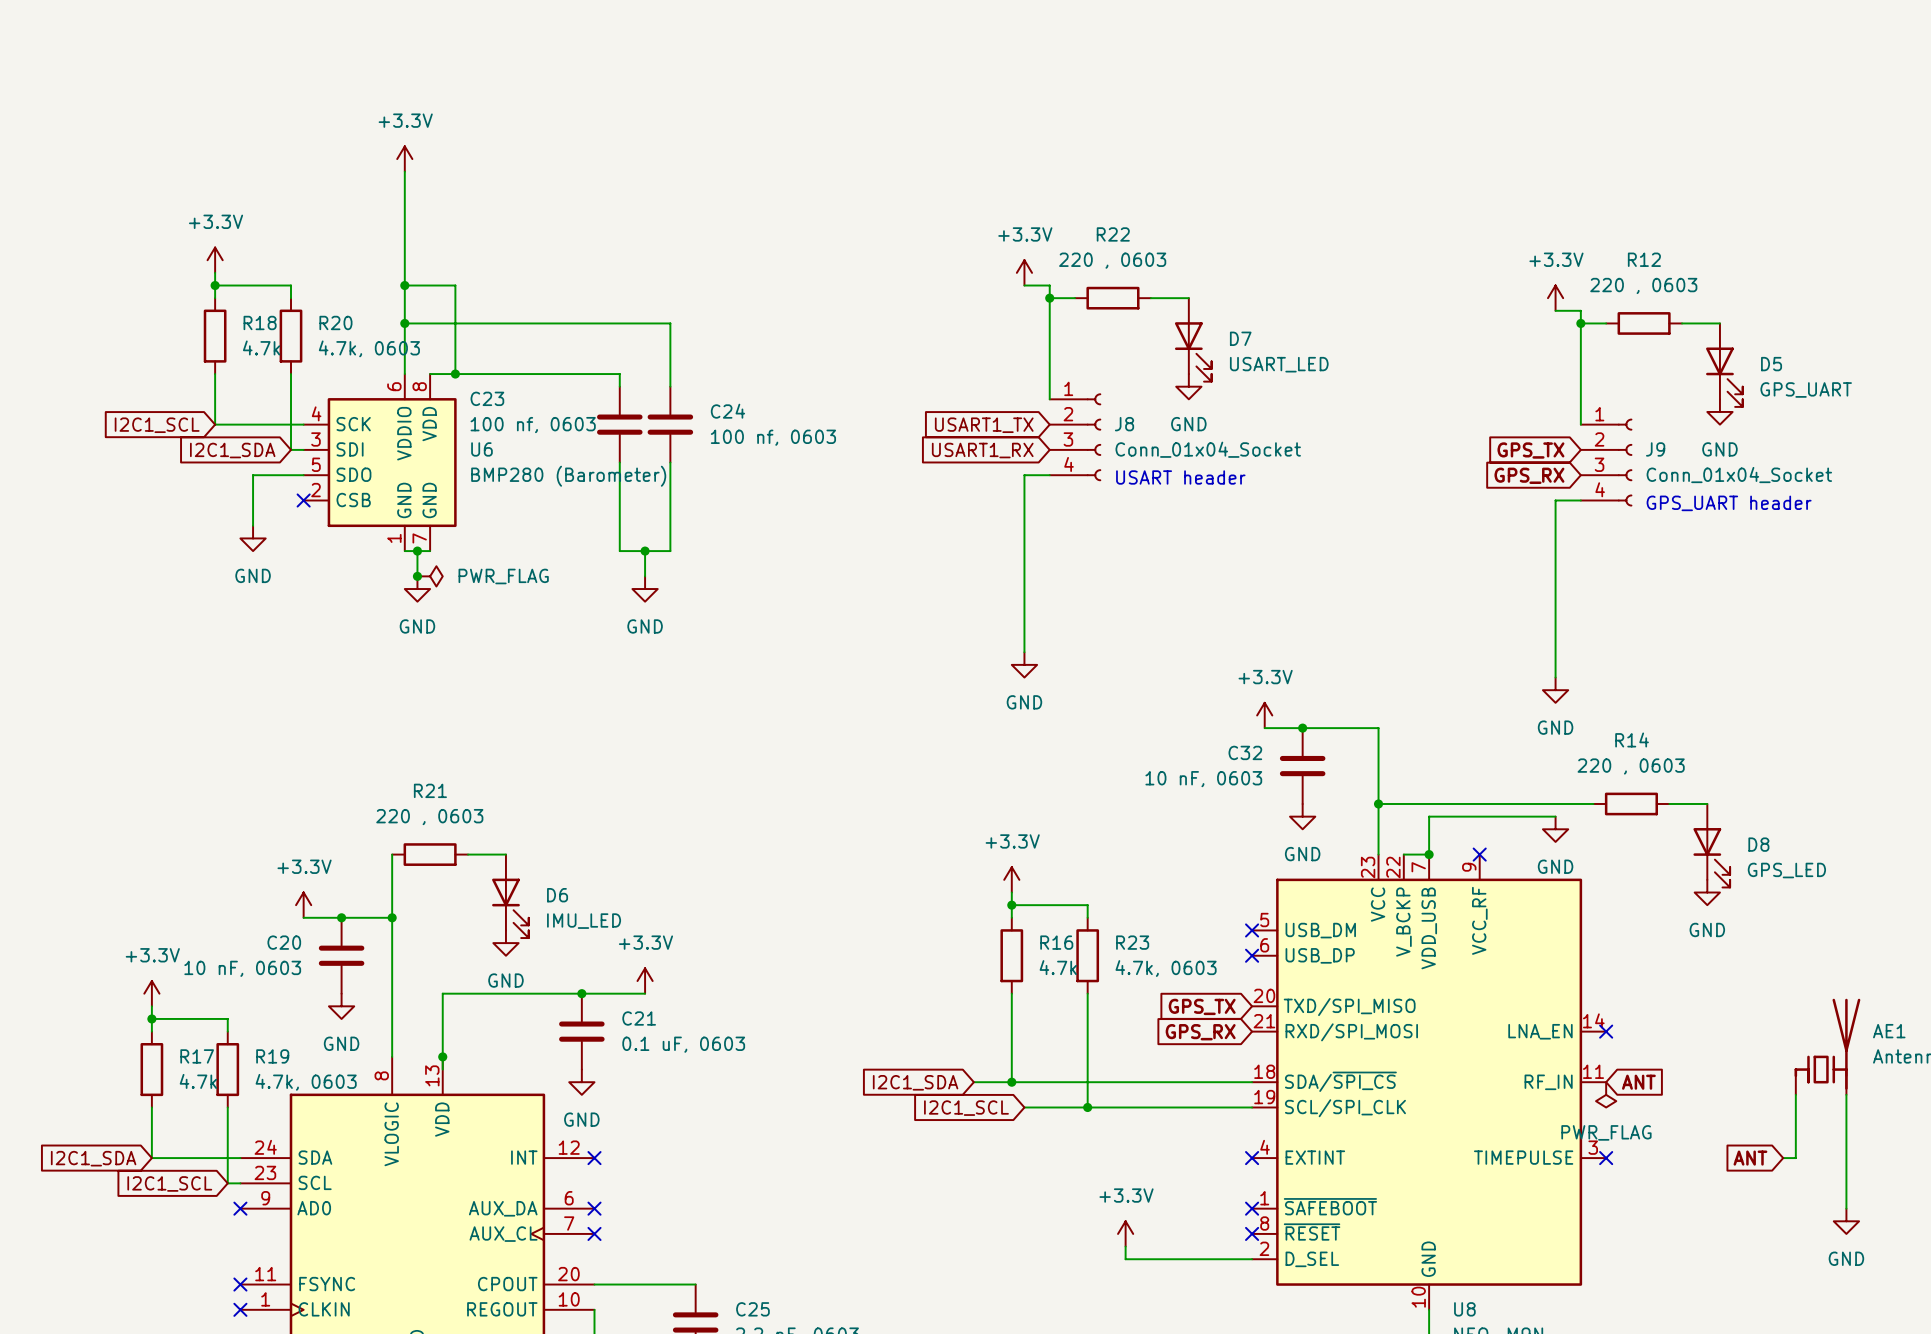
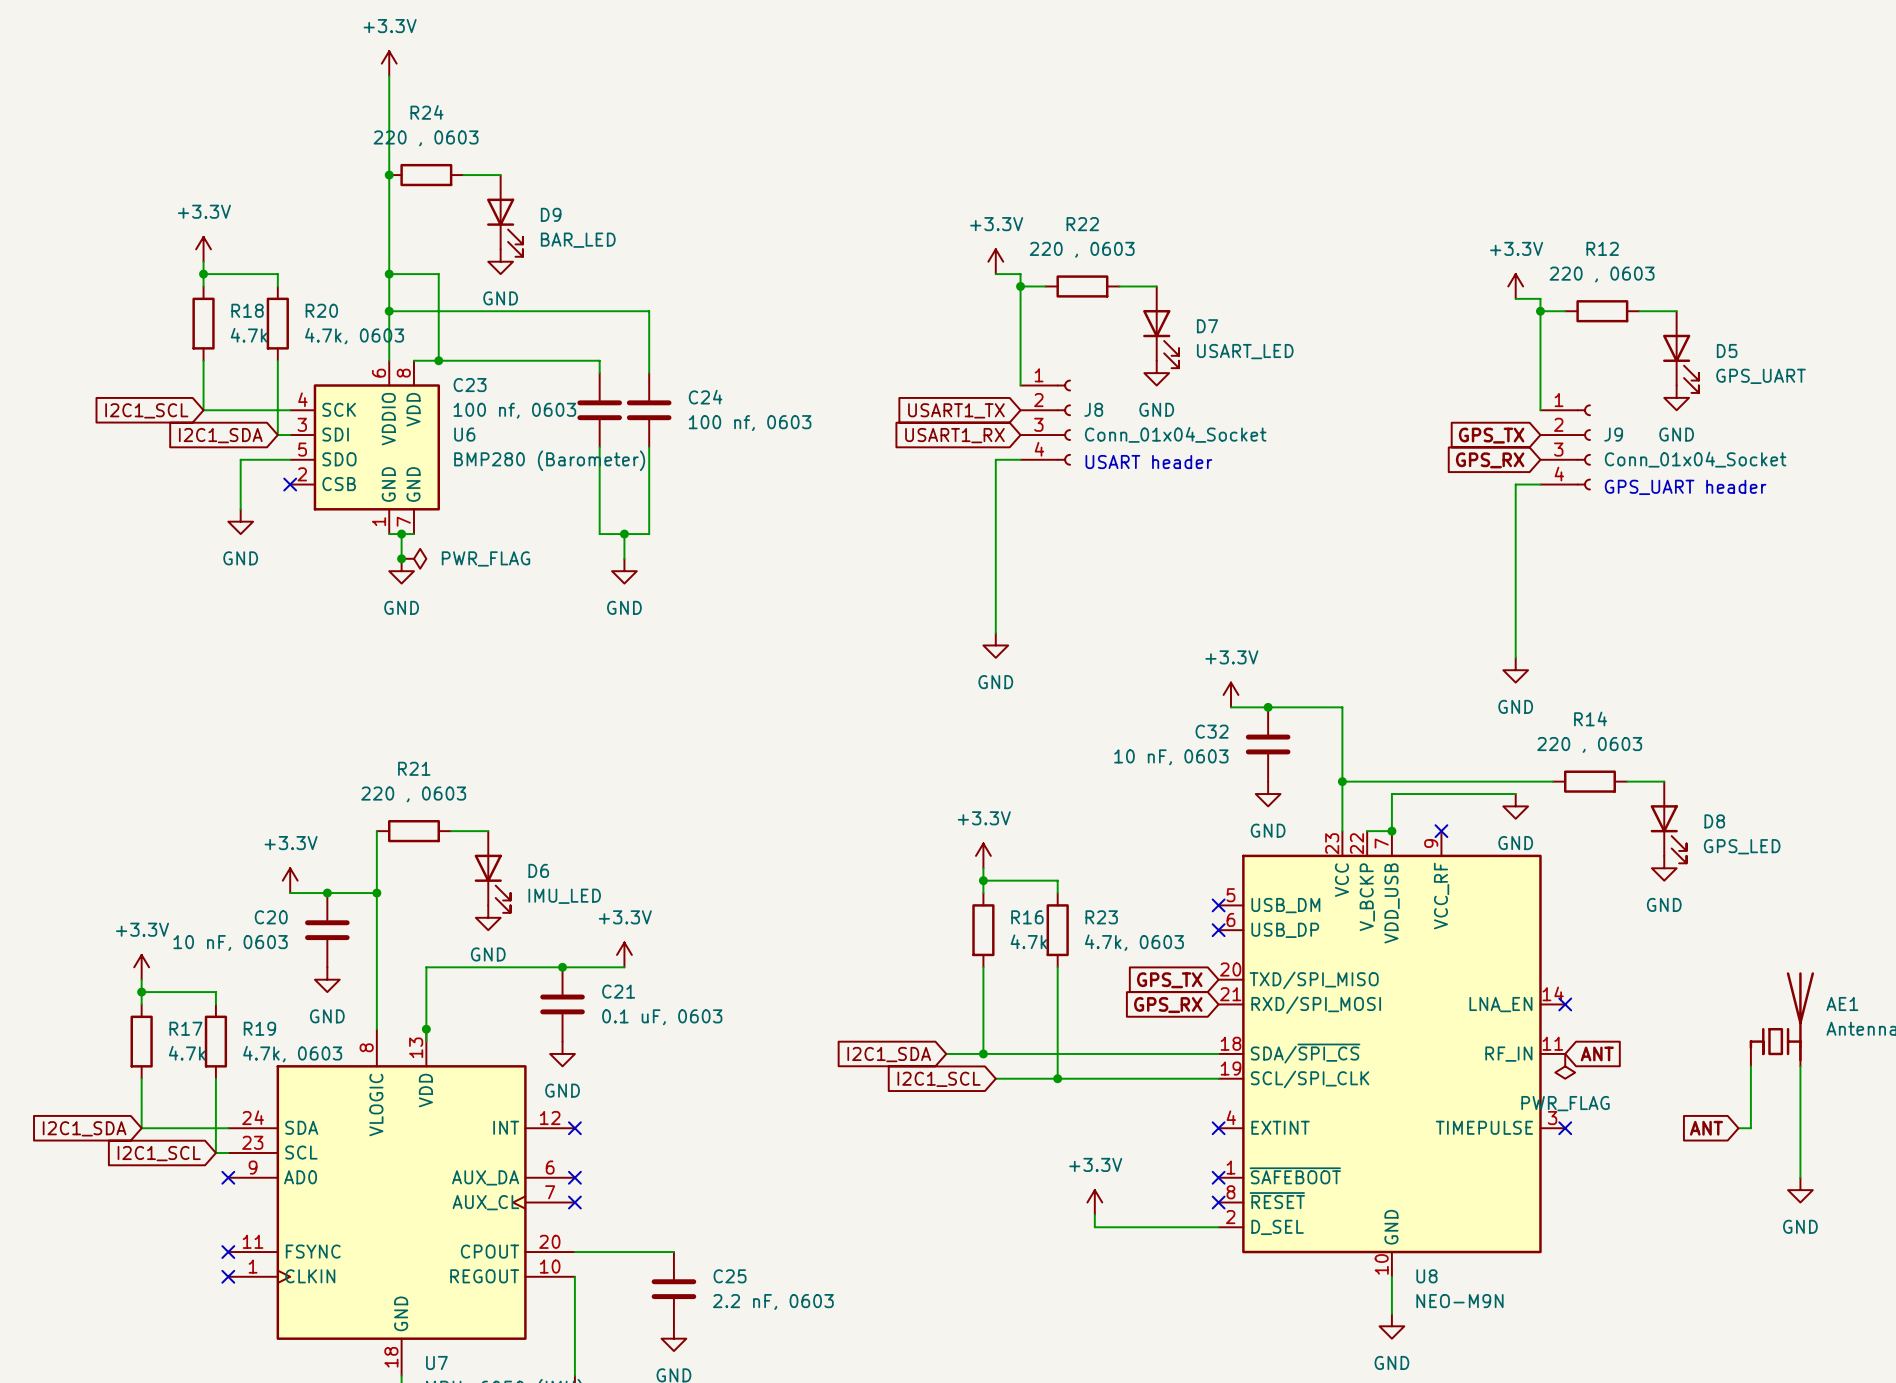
wire: none -> (389, 76) (389, 162)
power symbol position: +3.3V (404, 159) -> +3.3V (389, 63)
junction: none -> (389, 175)
R24: none -> 220 , 0603 (426, 175)
wire: none -> (463, 175) (500, 175)
D9: none -> BAR_LED (504, 215)
power symbol: none -> GND (500, 261)

